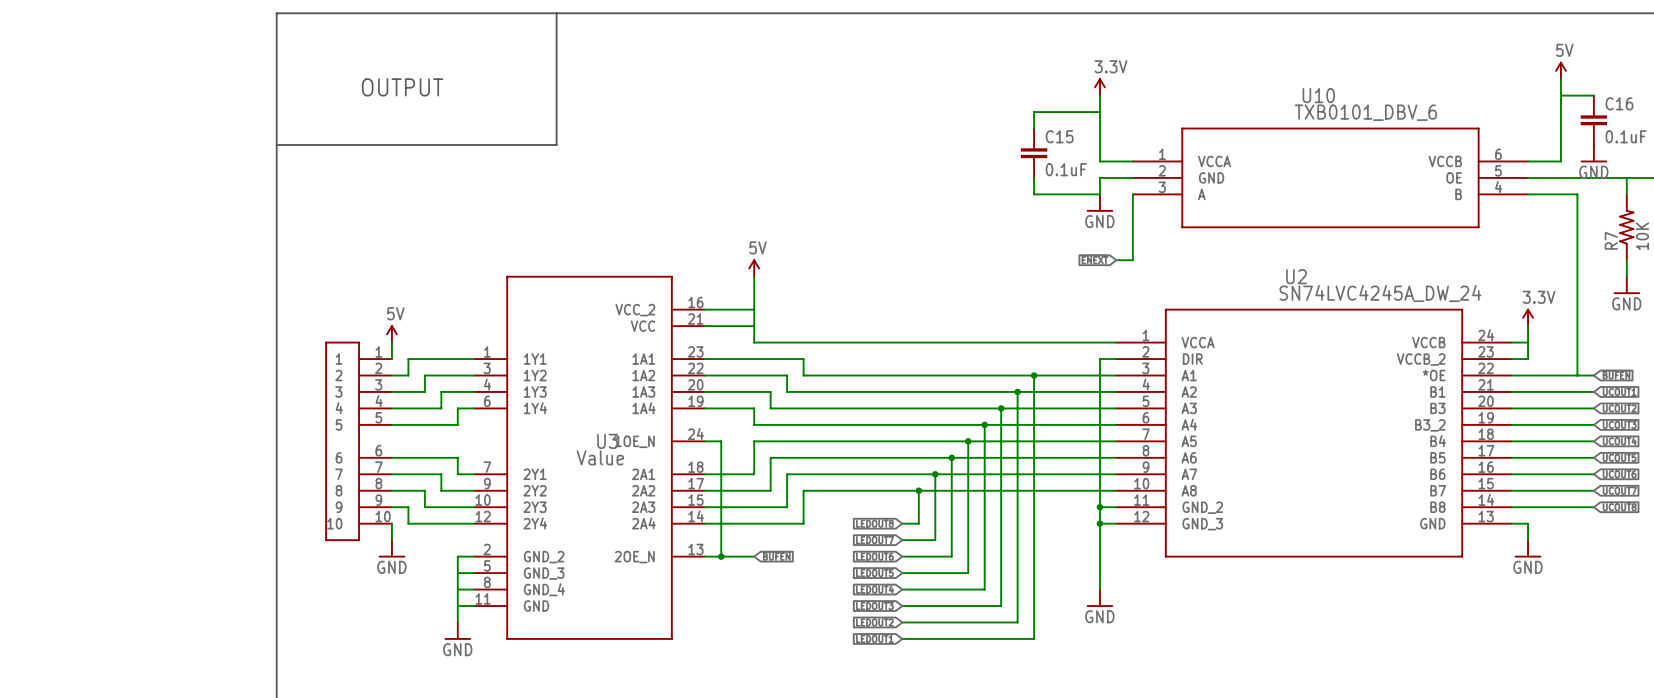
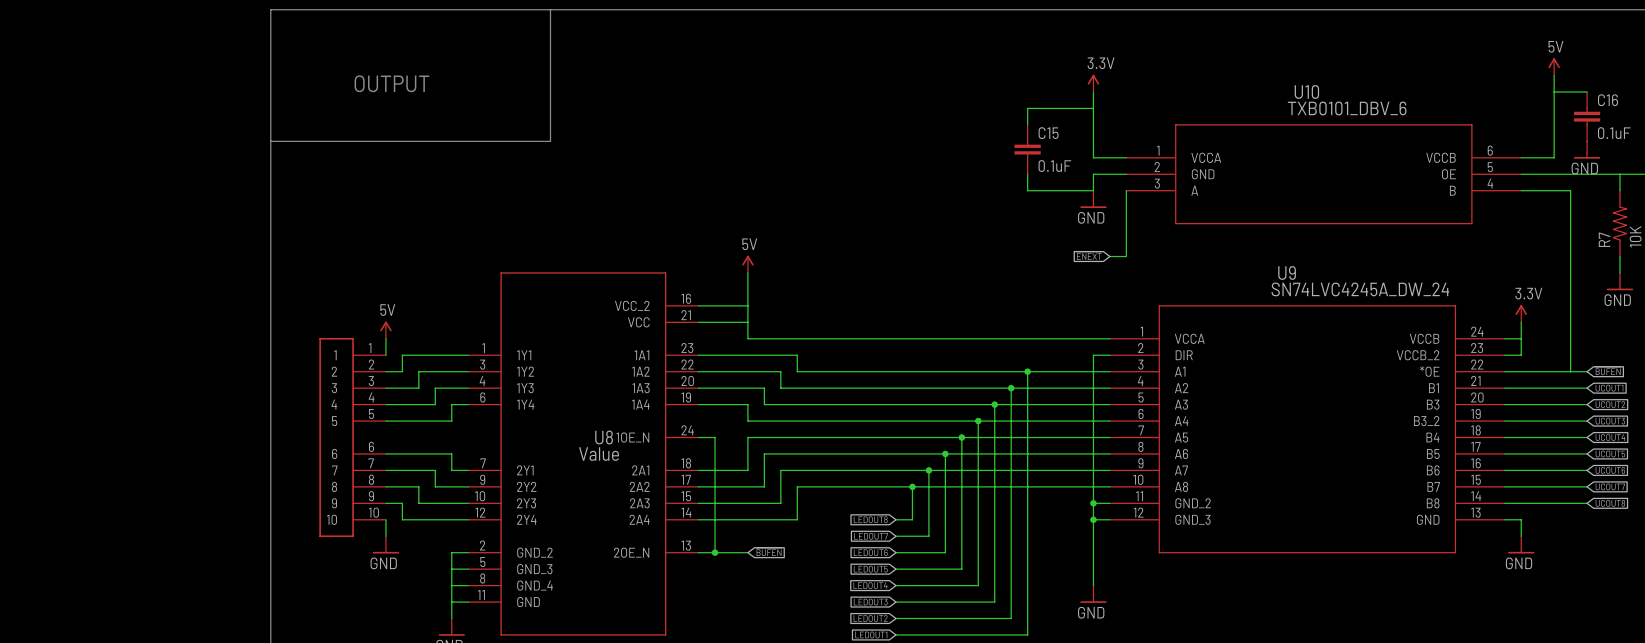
U2 name: U2 (1296, 276) -> U9 (1287, 272)
U3 name: U3 (607, 441) -> U8 (604, 437)

